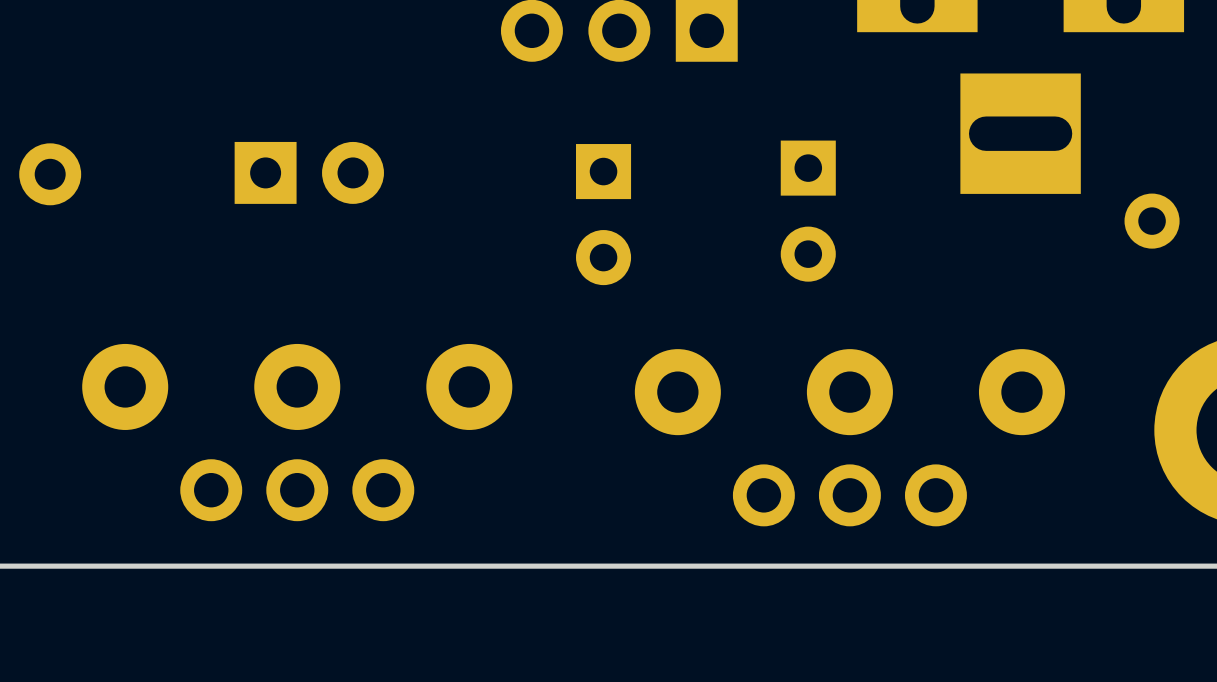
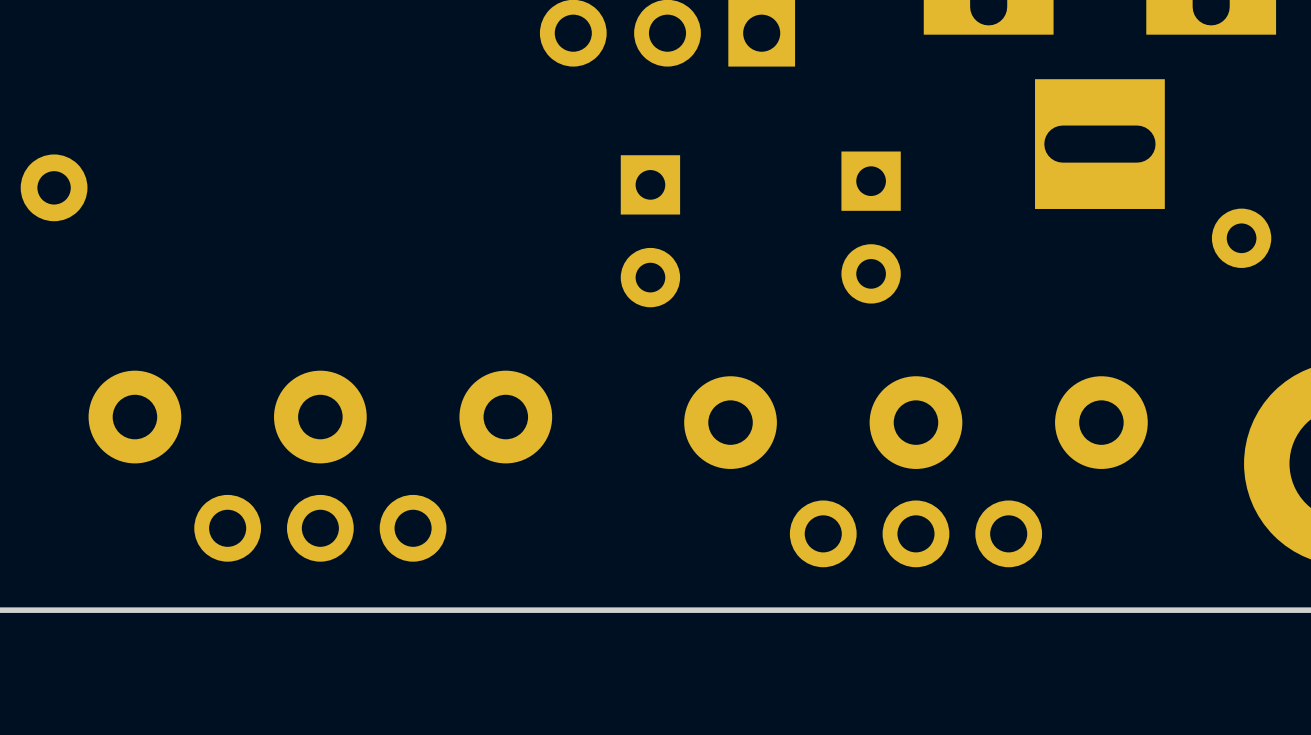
part: (309, 172) -> none

